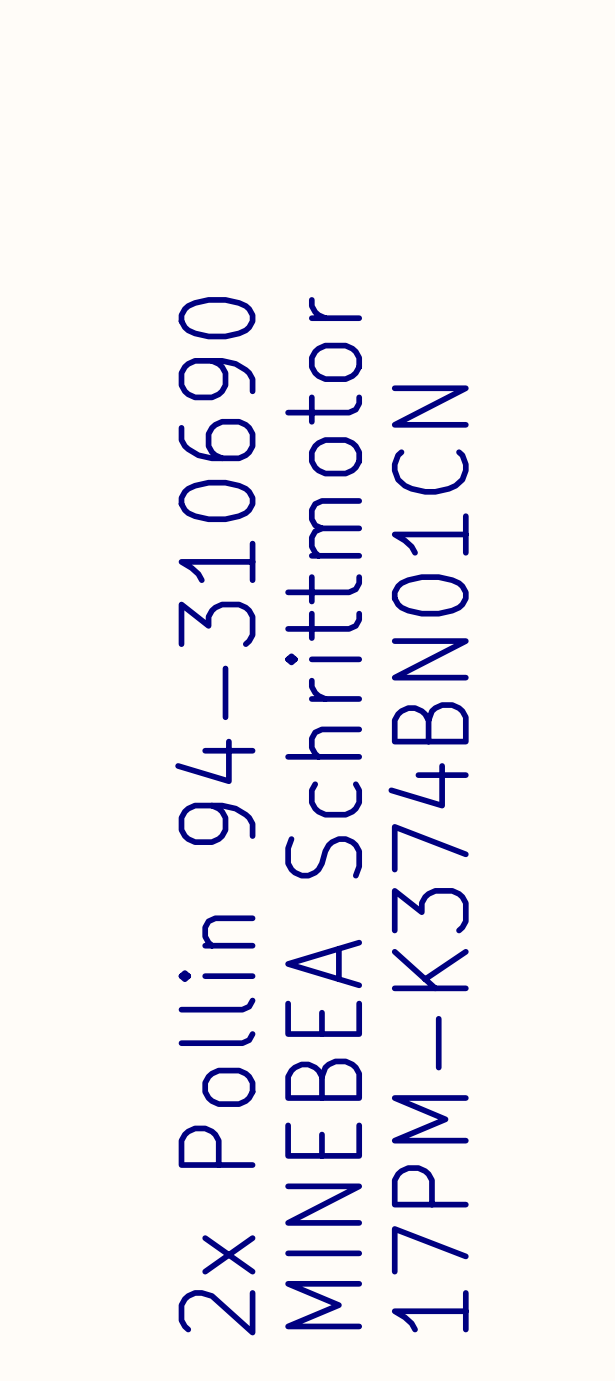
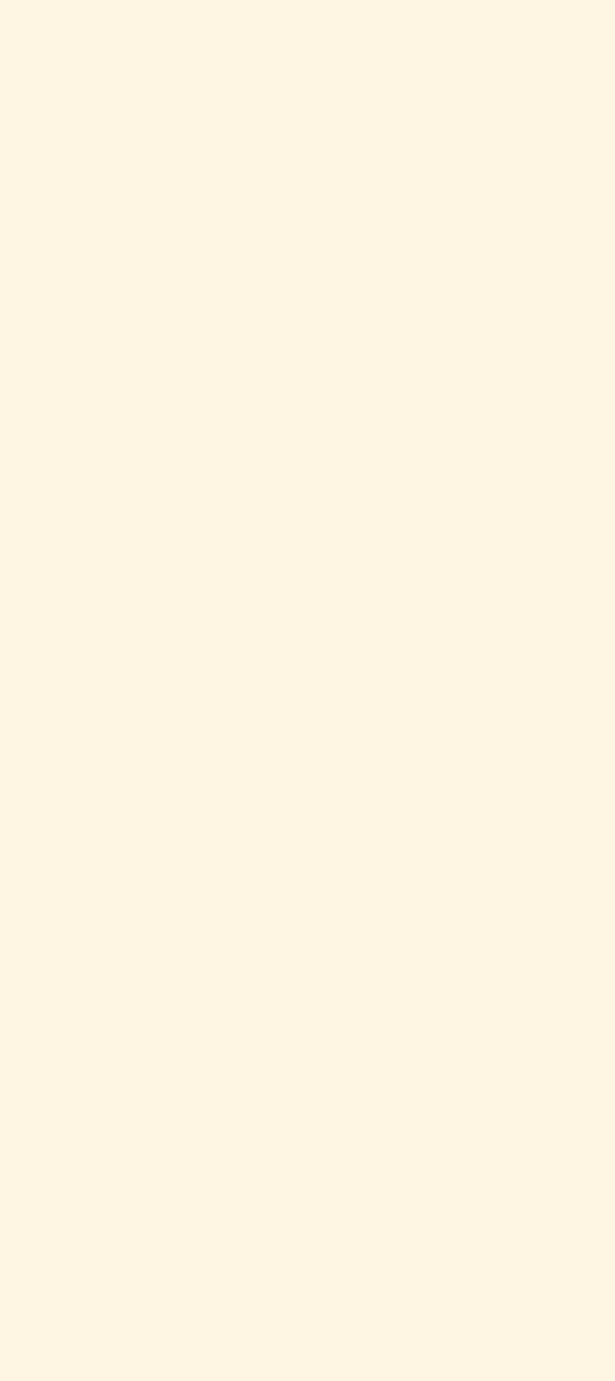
text: MINEBEA Schrittmotor (323, 813) -> none
text: 2x Pollin 94-310690 (215, 816) -> none
text: 17PM-K374BN01CN (428, 858) -> none

